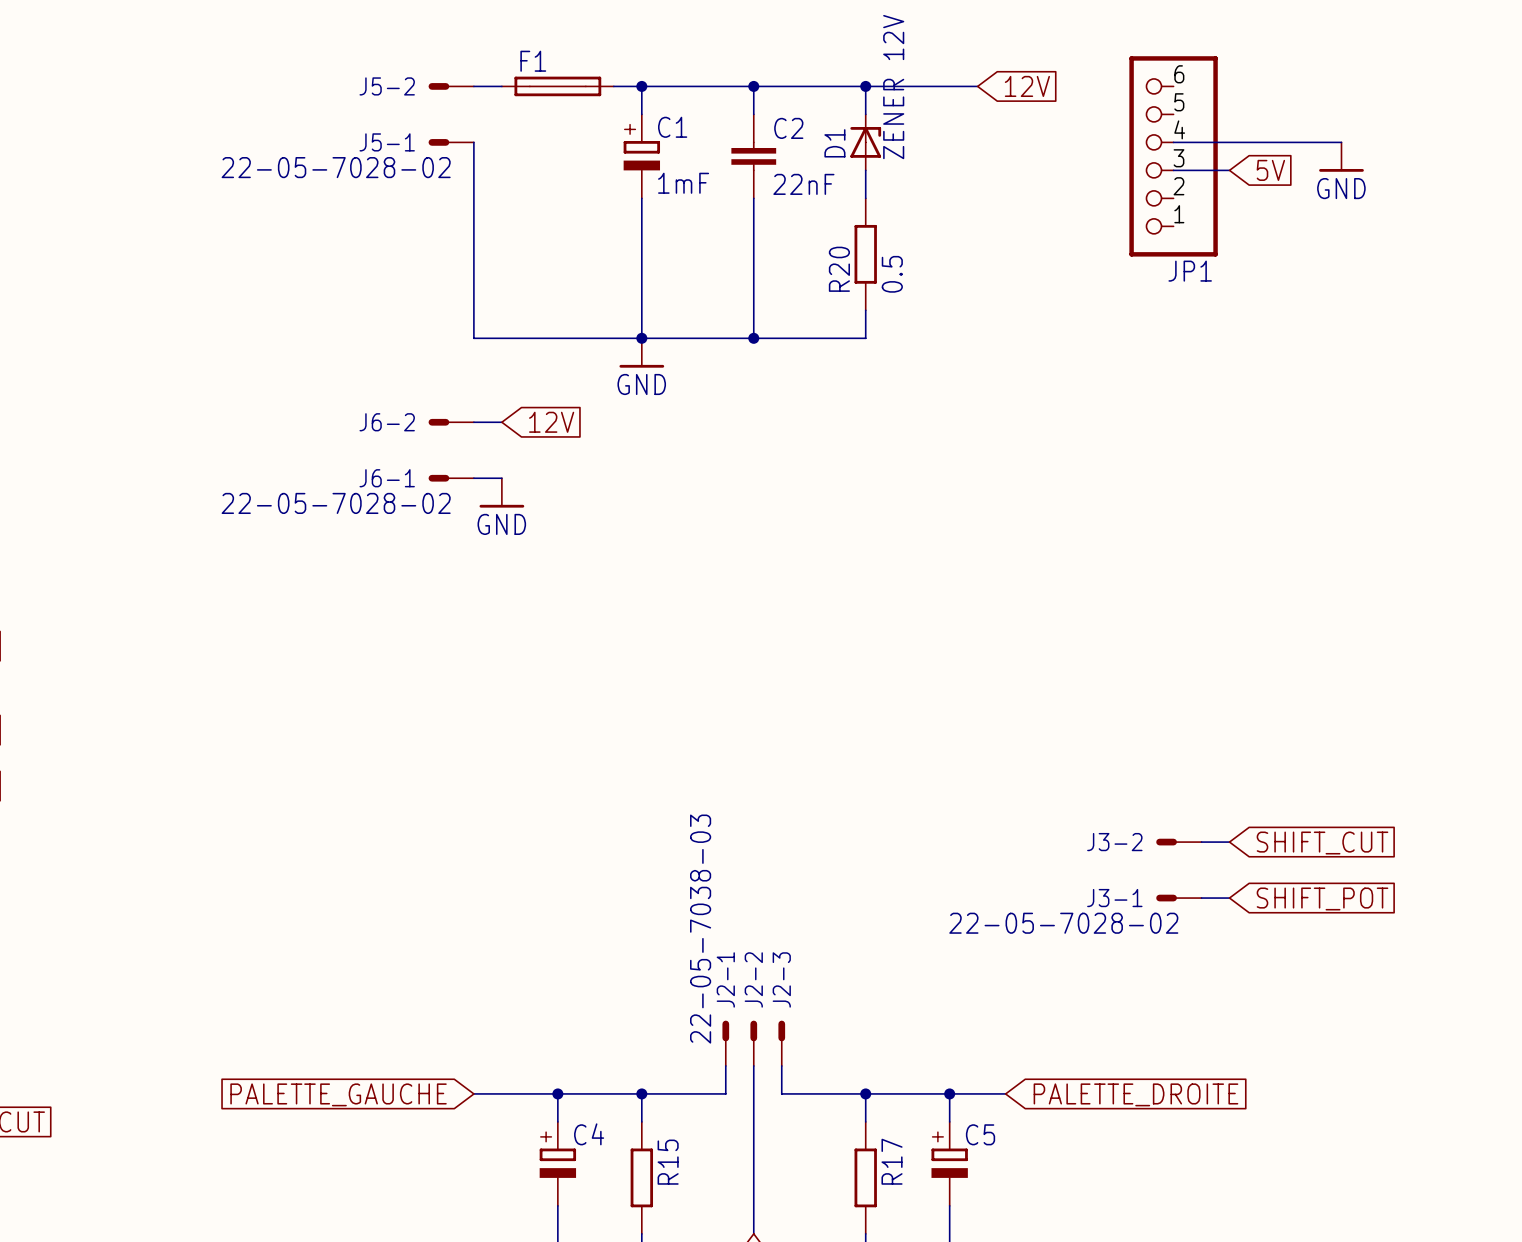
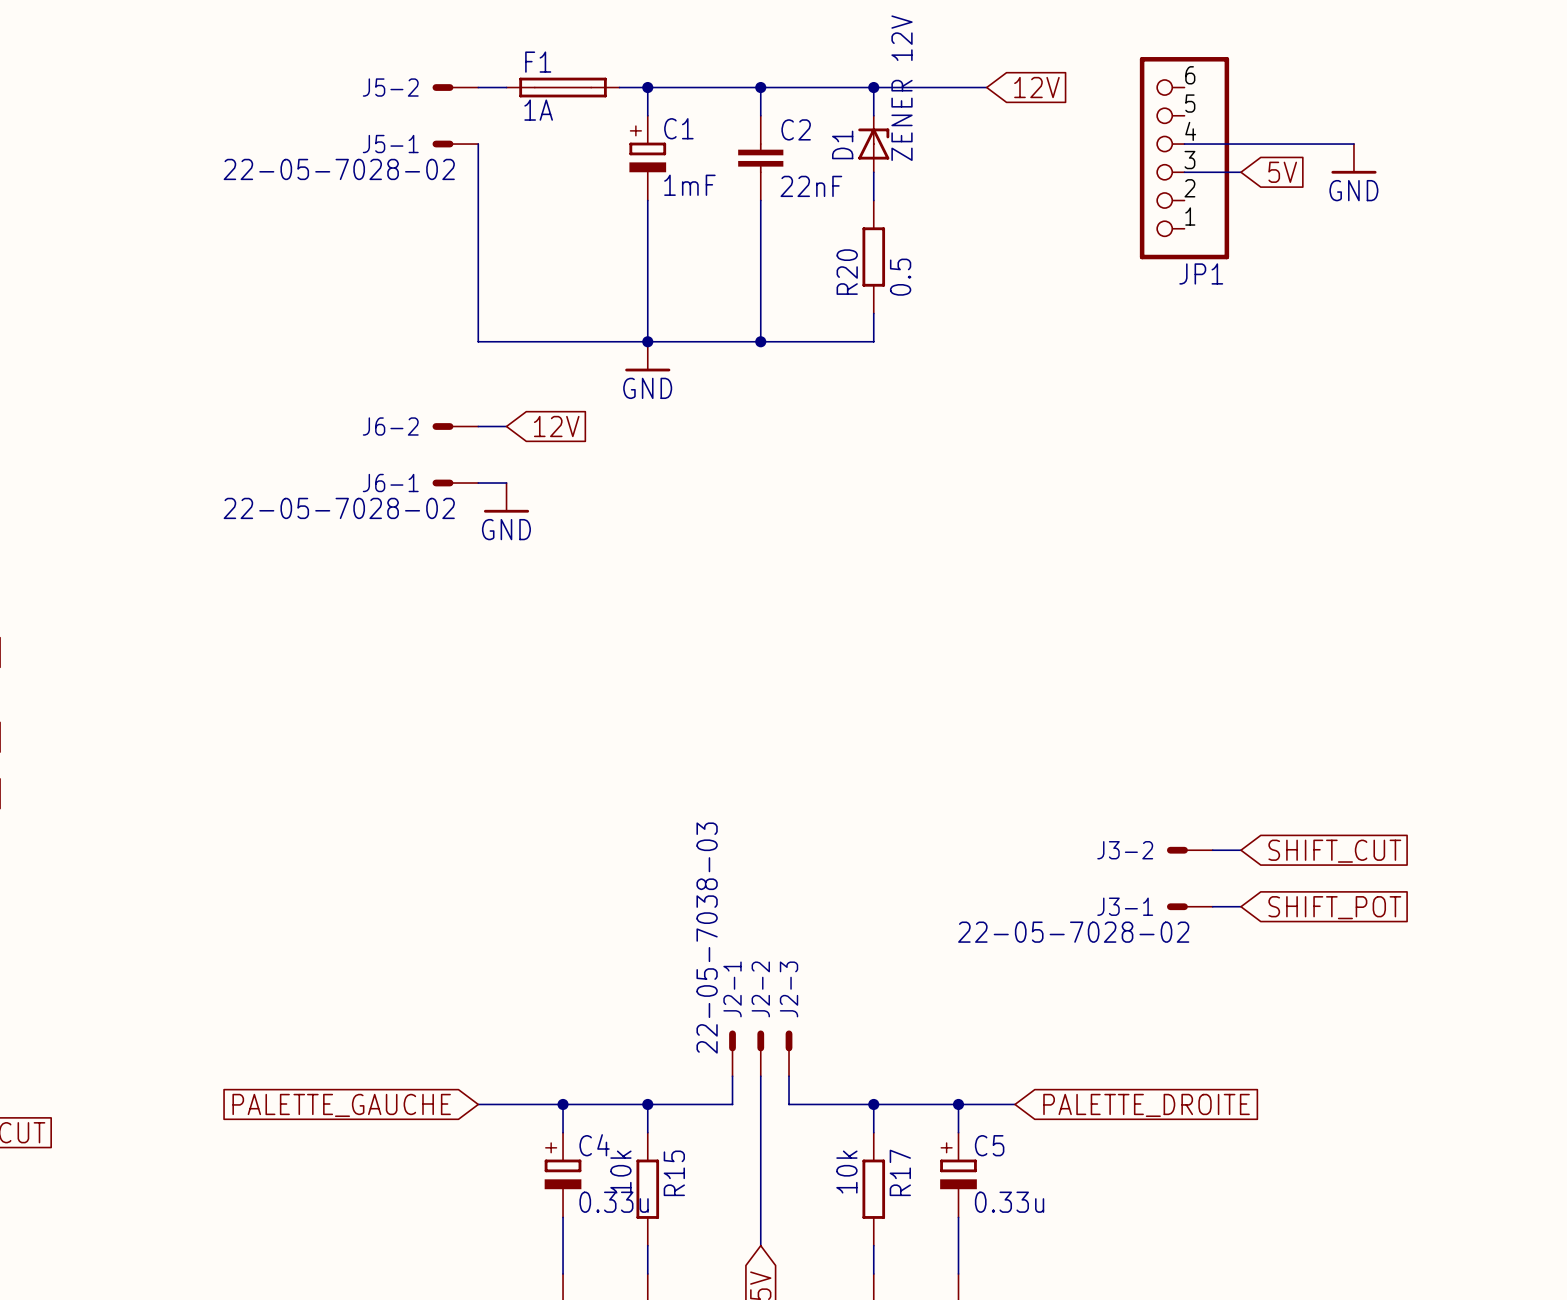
F1 value: none -> 1A (538, 110)
R15 value: none -> 10k (620, 1172)
R17 value: none -> 10k (846, 1172)
C4 value: none -> 0.33u (614, 1202)
C5 value: none -> 0.33u (1009, 1202)

